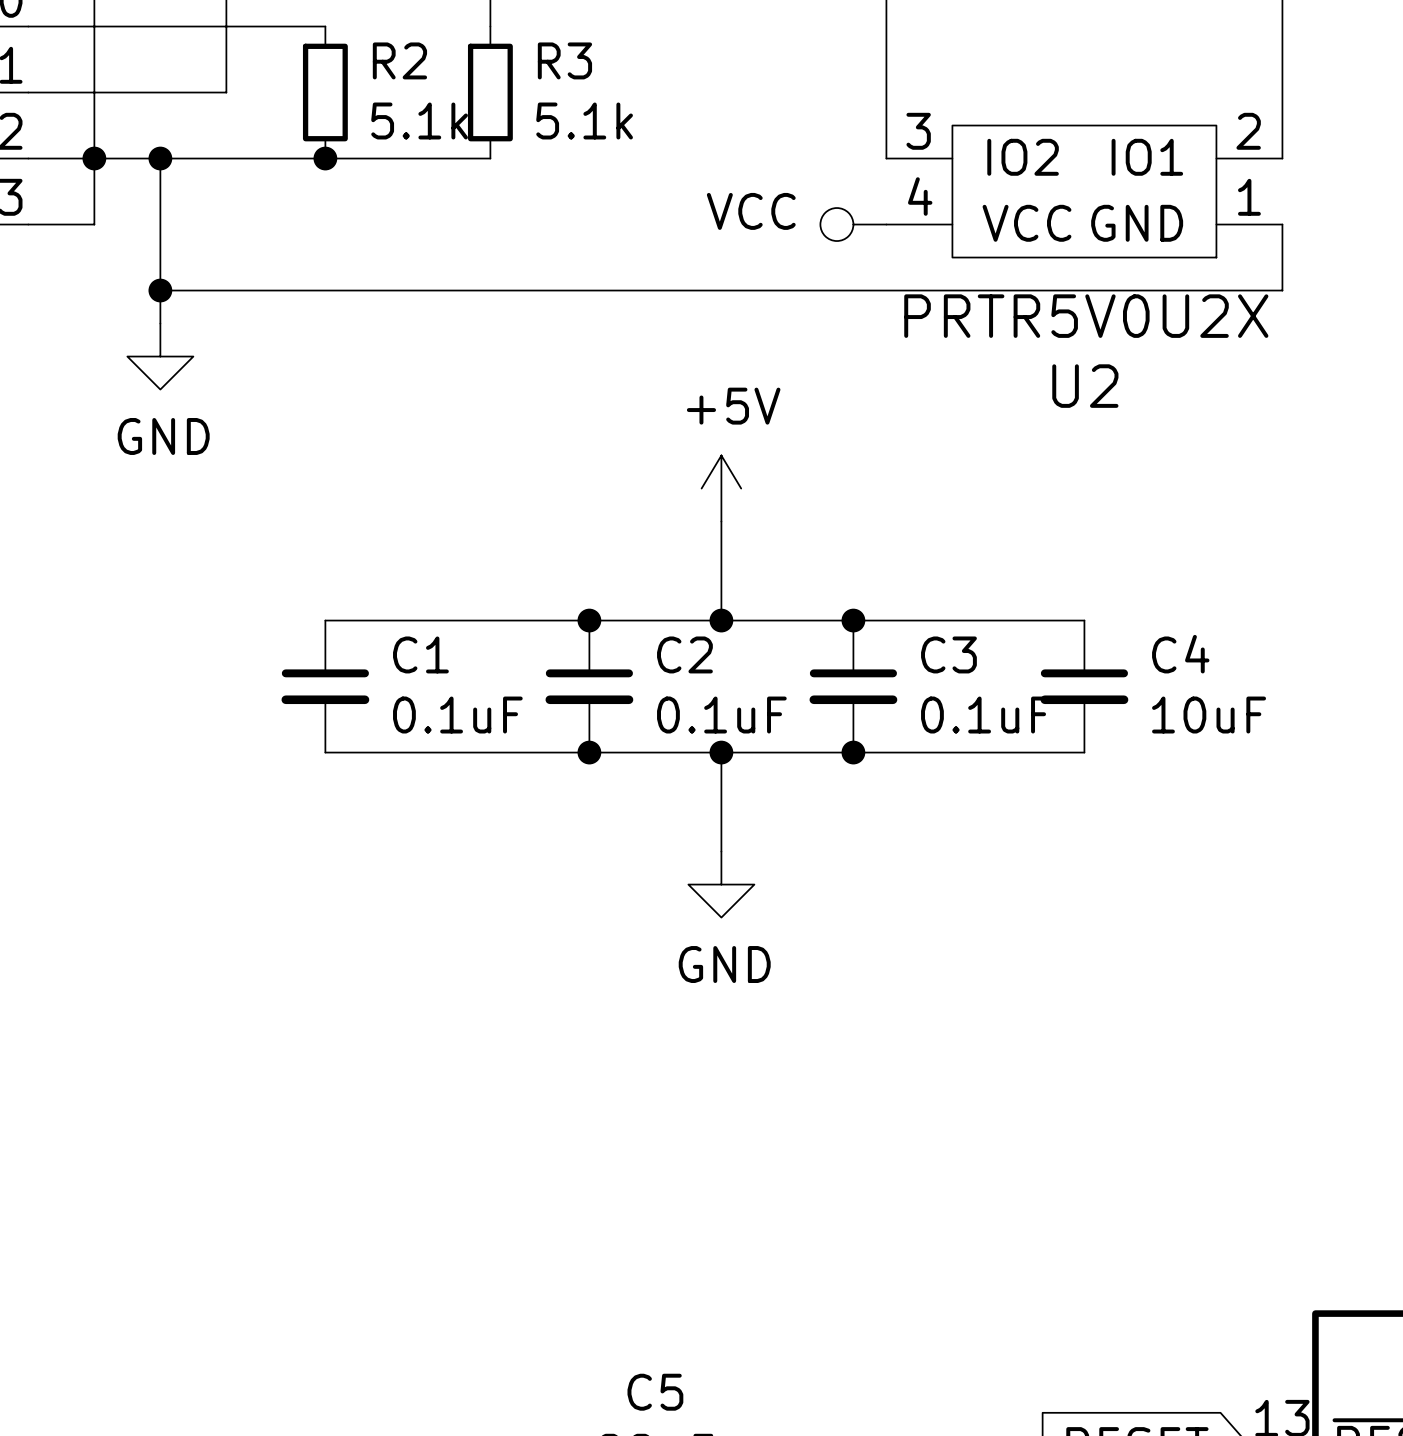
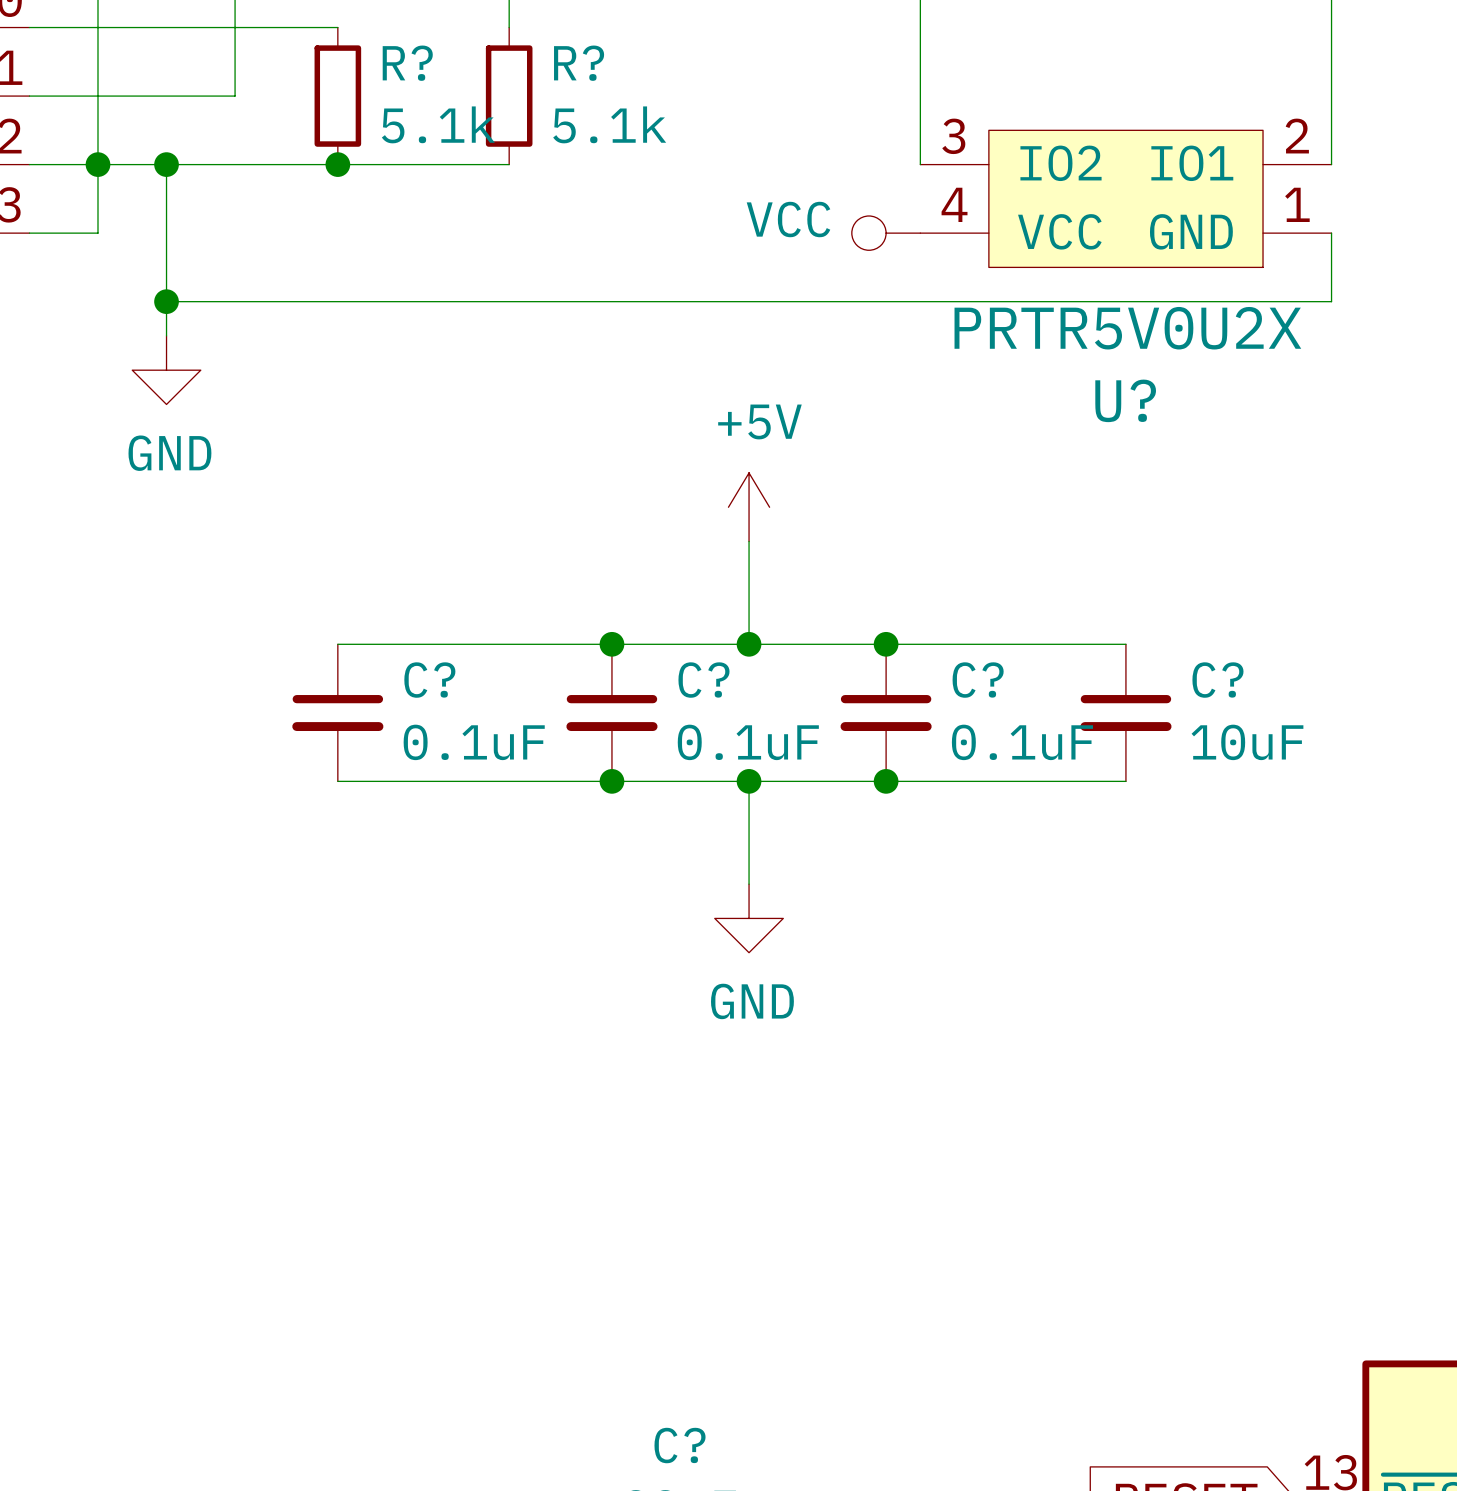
R2 name: R2 (399, 60) -> R? (407, 63)
R3 name: R3 (564, 60) -> R? (579, 63)
U2 name: U2 (1085, 386) -> U? (1125, 400)
C1 name: C1 (420, 654) -> C? (429, 680)
C2 name: C2 (684, 654) -> C? (703, 680)
C3 name: C3 (948, 654) -> C? (978, 680)
C4 name: C4 (1180, 654) -> C? (1217, 680)
C5 name: C5 (655, 1392) -> C? (680, 1445)

